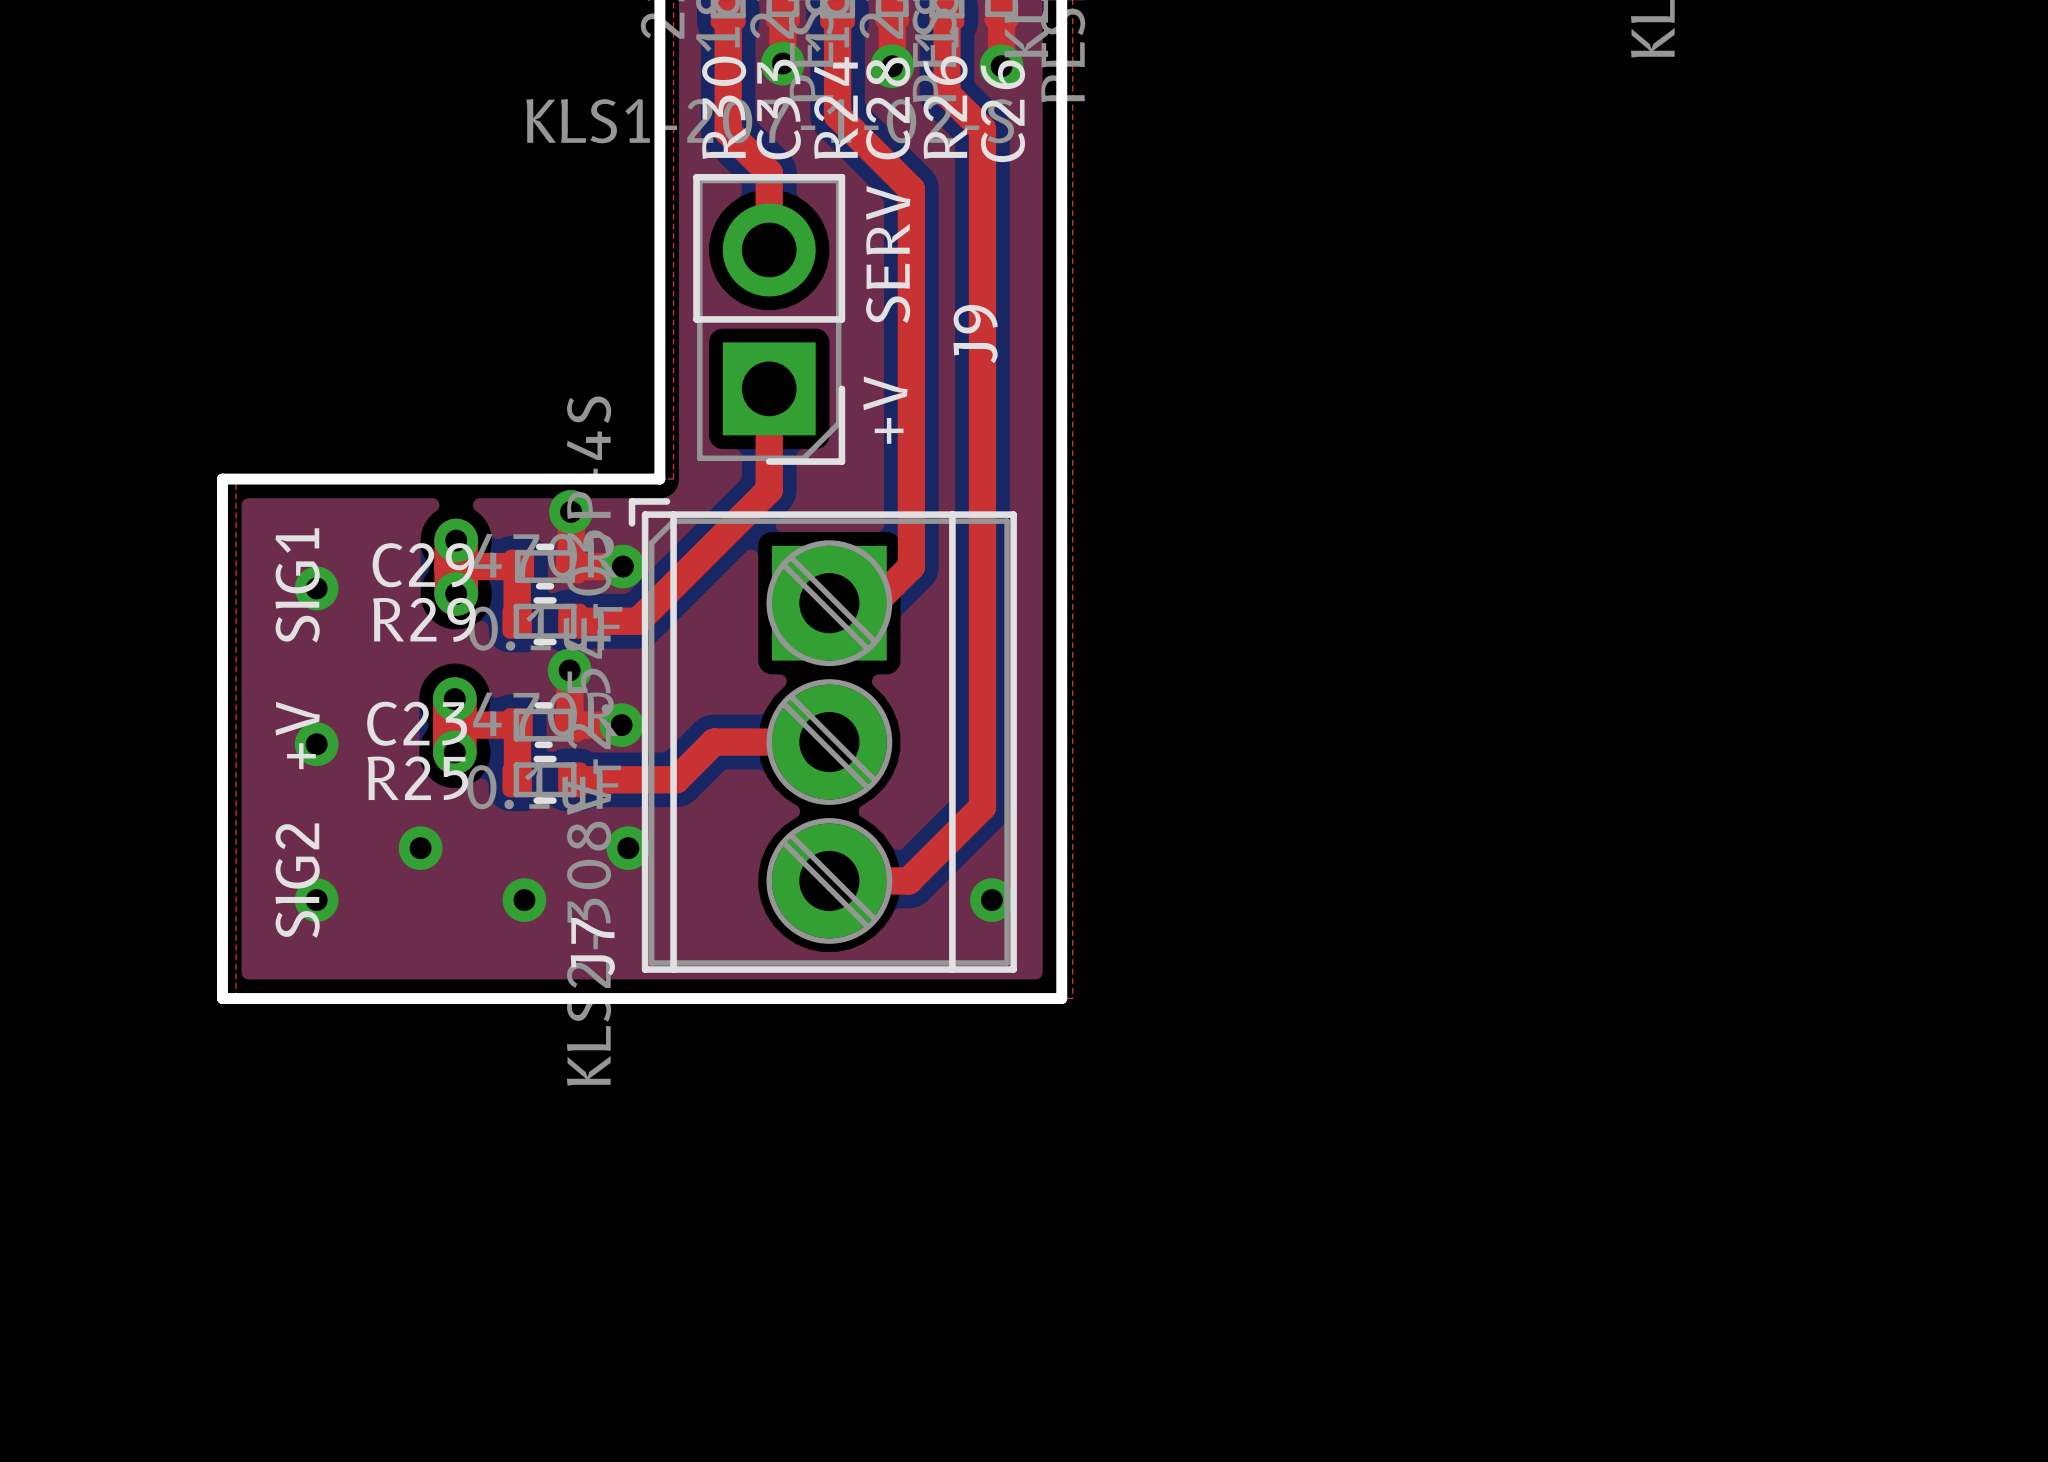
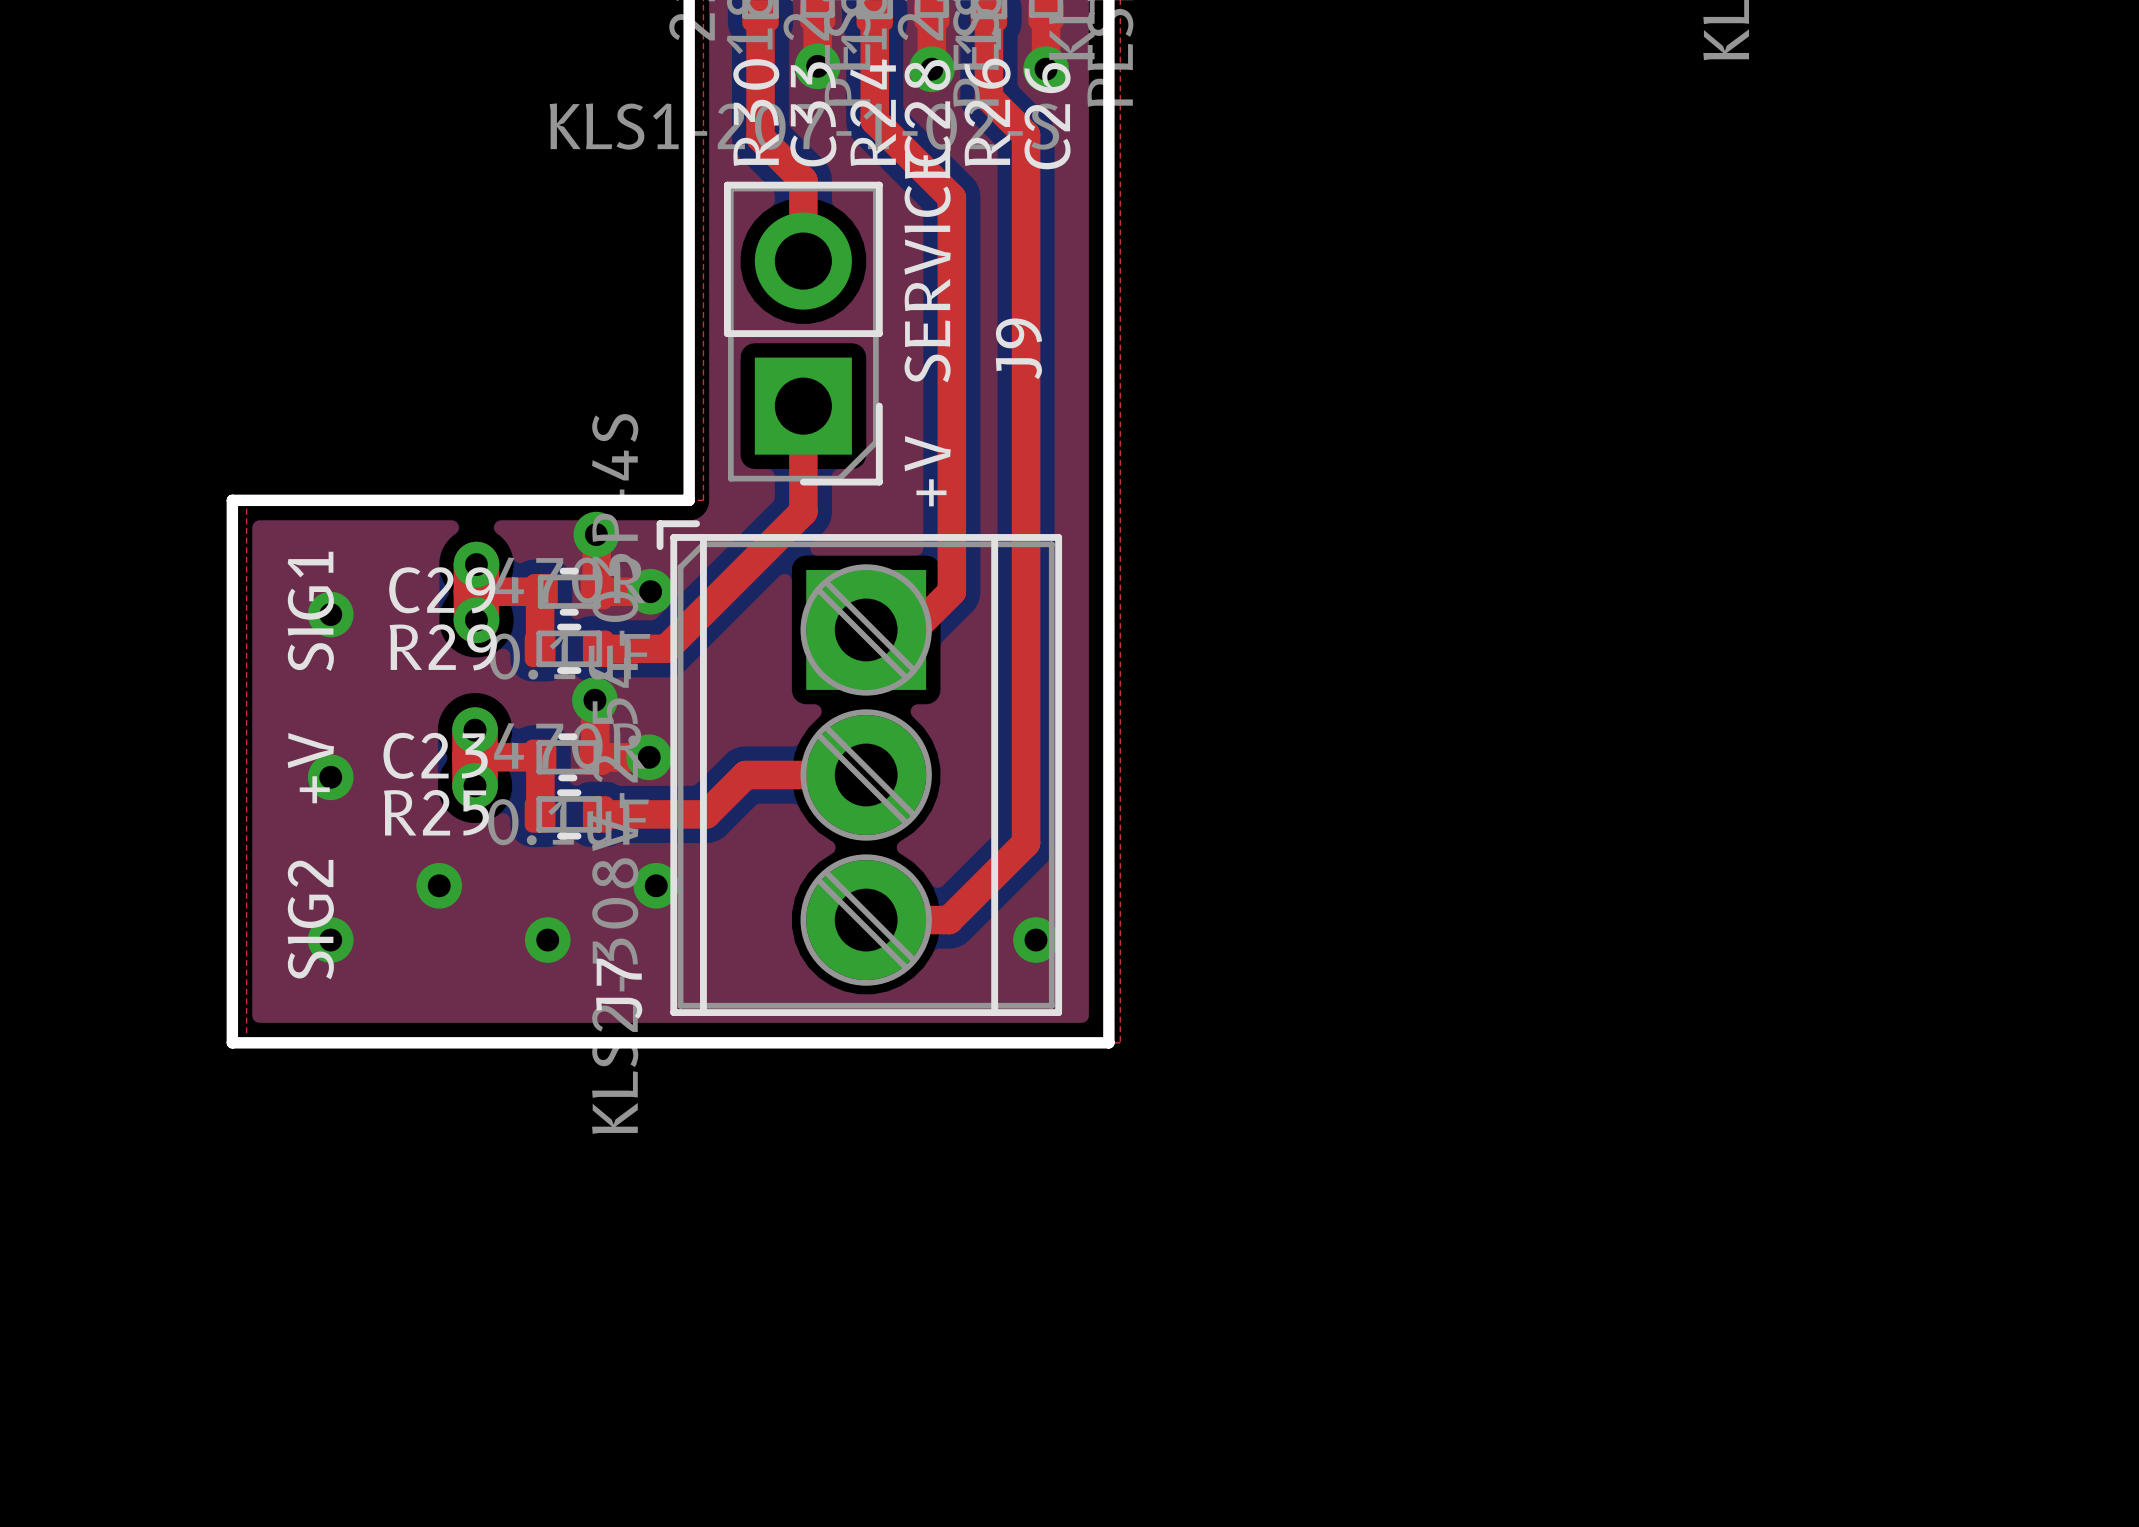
text: SERV (888, 254) -> SERVICE (927, 267)
text position: +V (885, 410) -> +V (927, 471)

